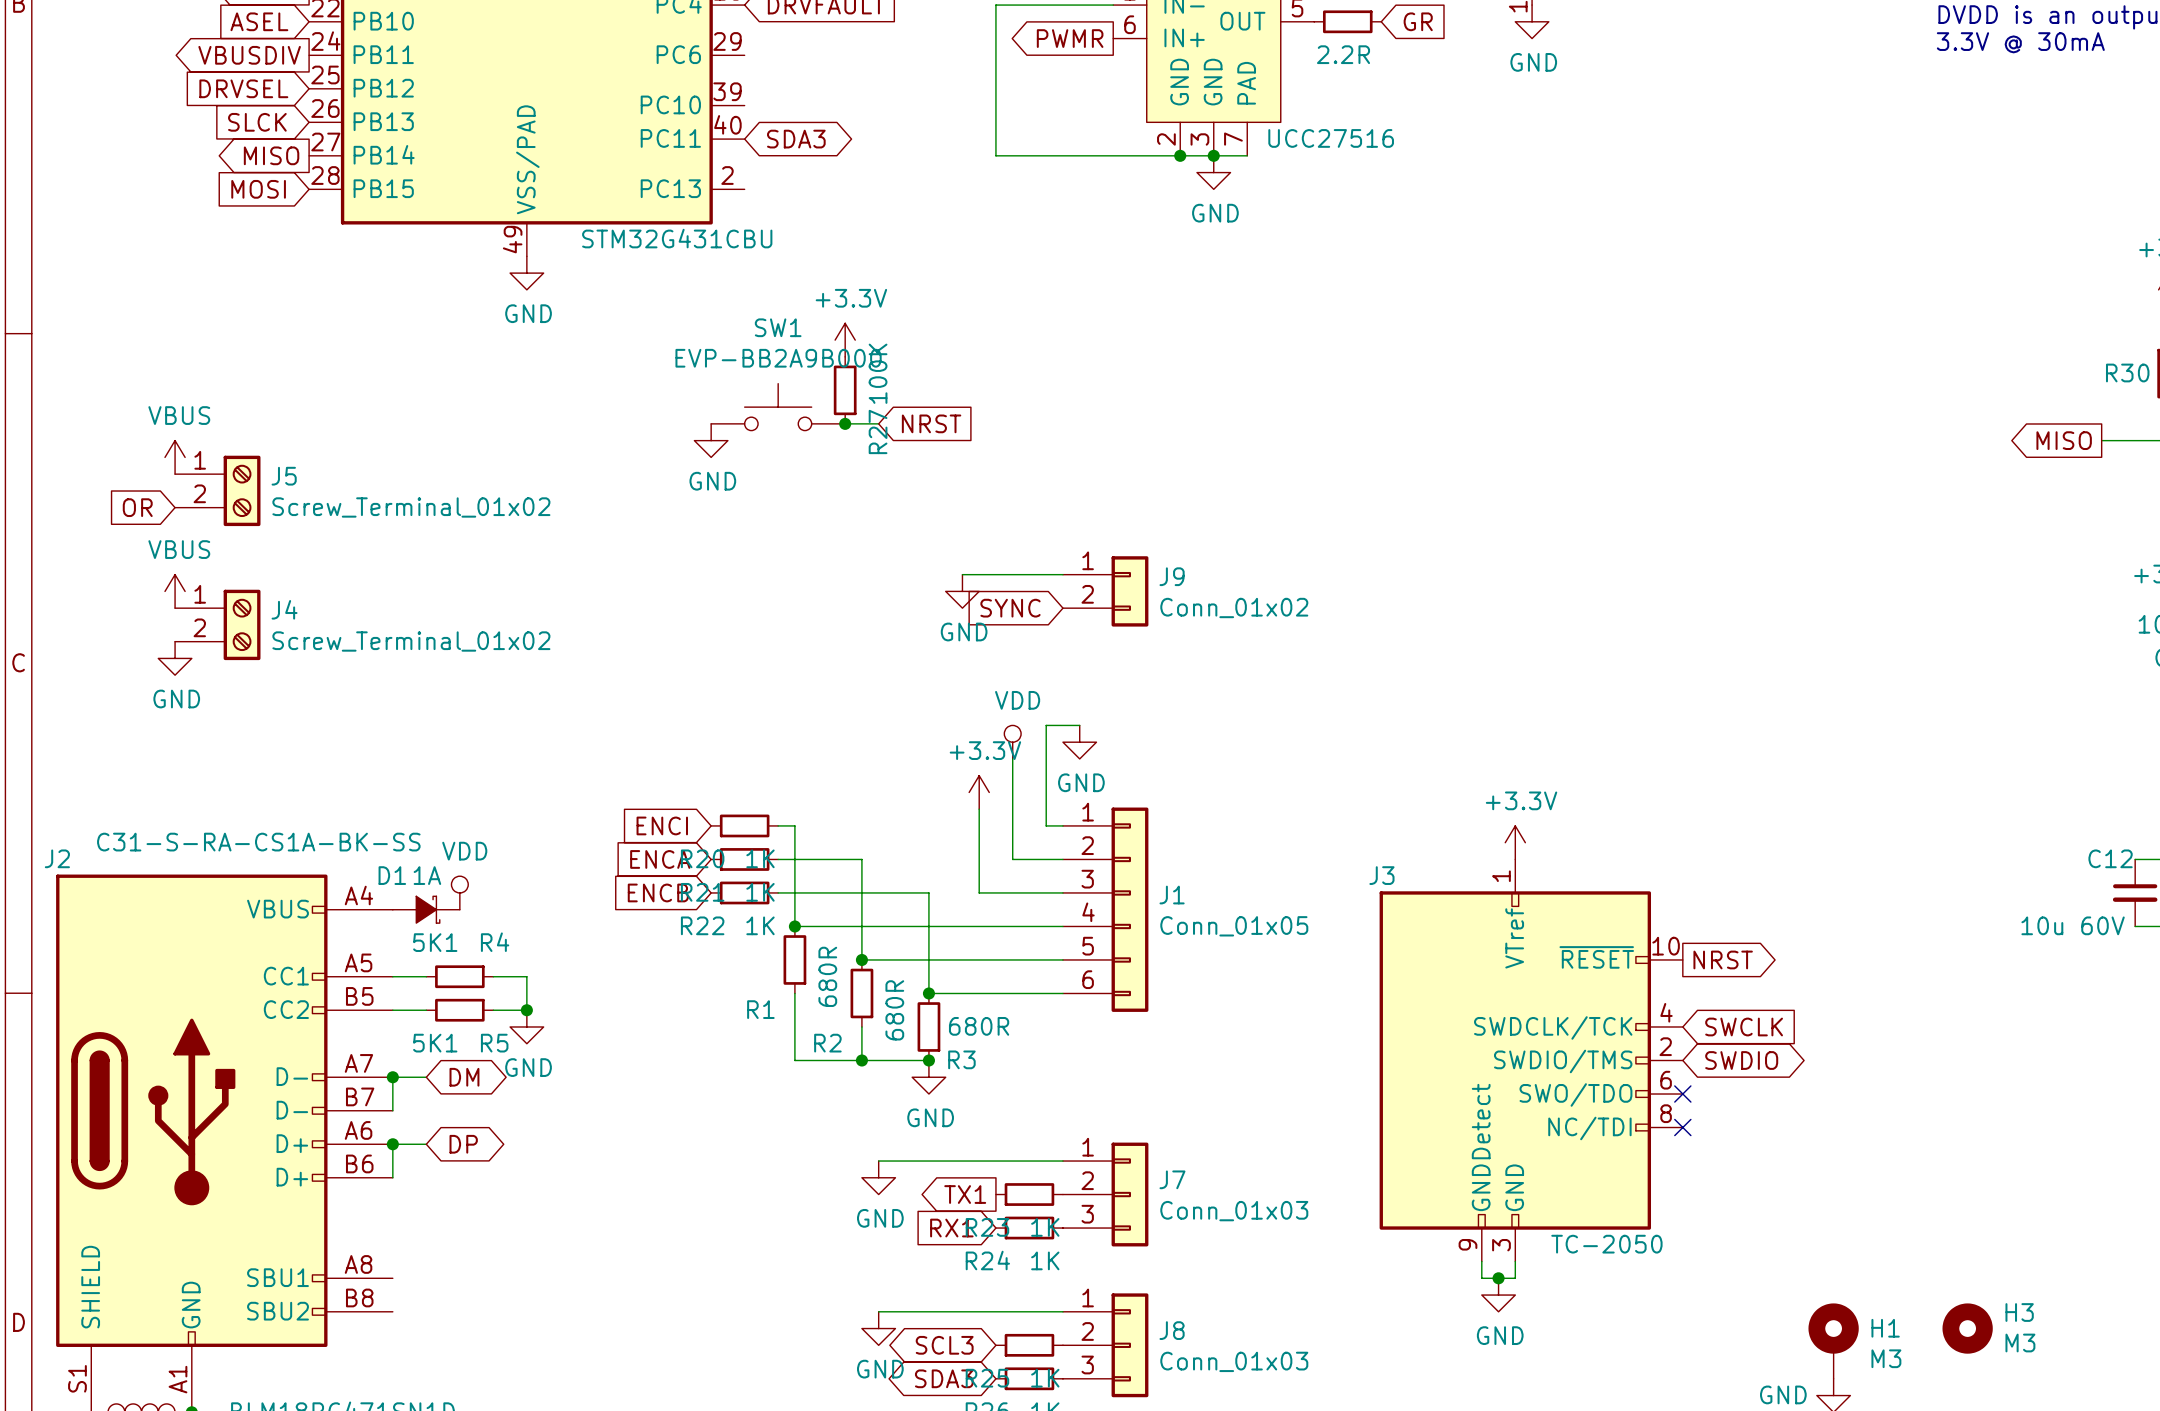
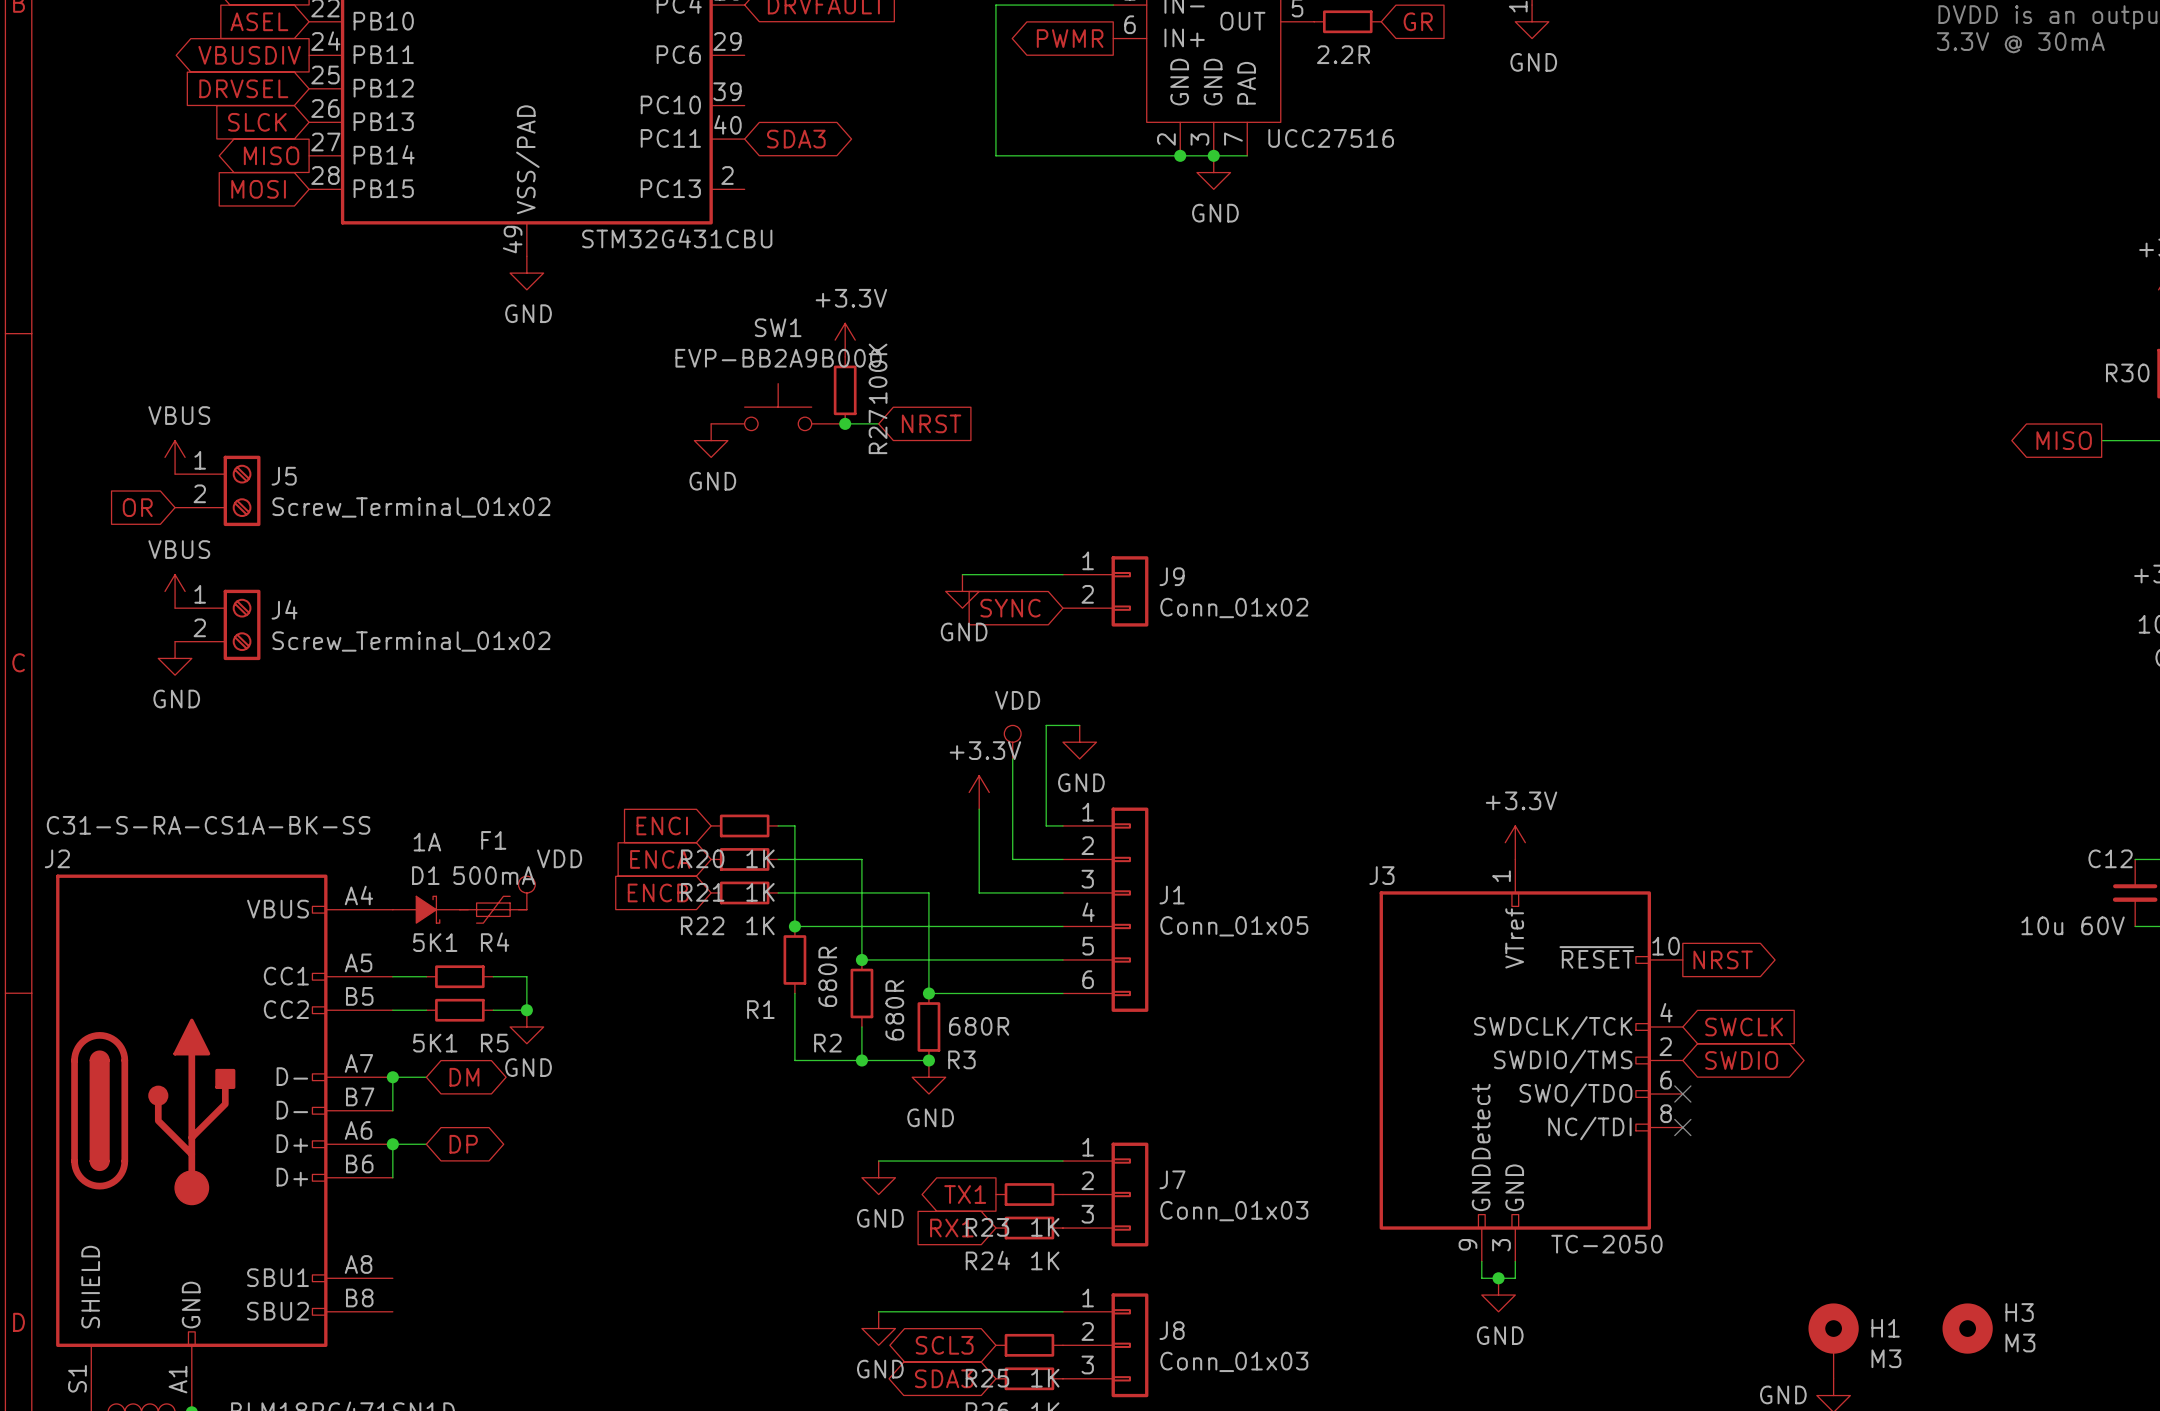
J2 value position: C31-S-RA-CS1A-BK-SS (258, 842) -> C31-S-RA-CS1A-BK-SS (208, 825)
power symbol text position: VDD (464, 851) -> VDD (559, 858)
D1 name position: D1 (392, 875) -> D1 (425, 875)
D1 value position: 1A (427, 875) -> 1A (427, 842)
power symbol position: VDD (459, 892) -> VDD (526, 892)
F1: none -> 500mA (493, 909)

